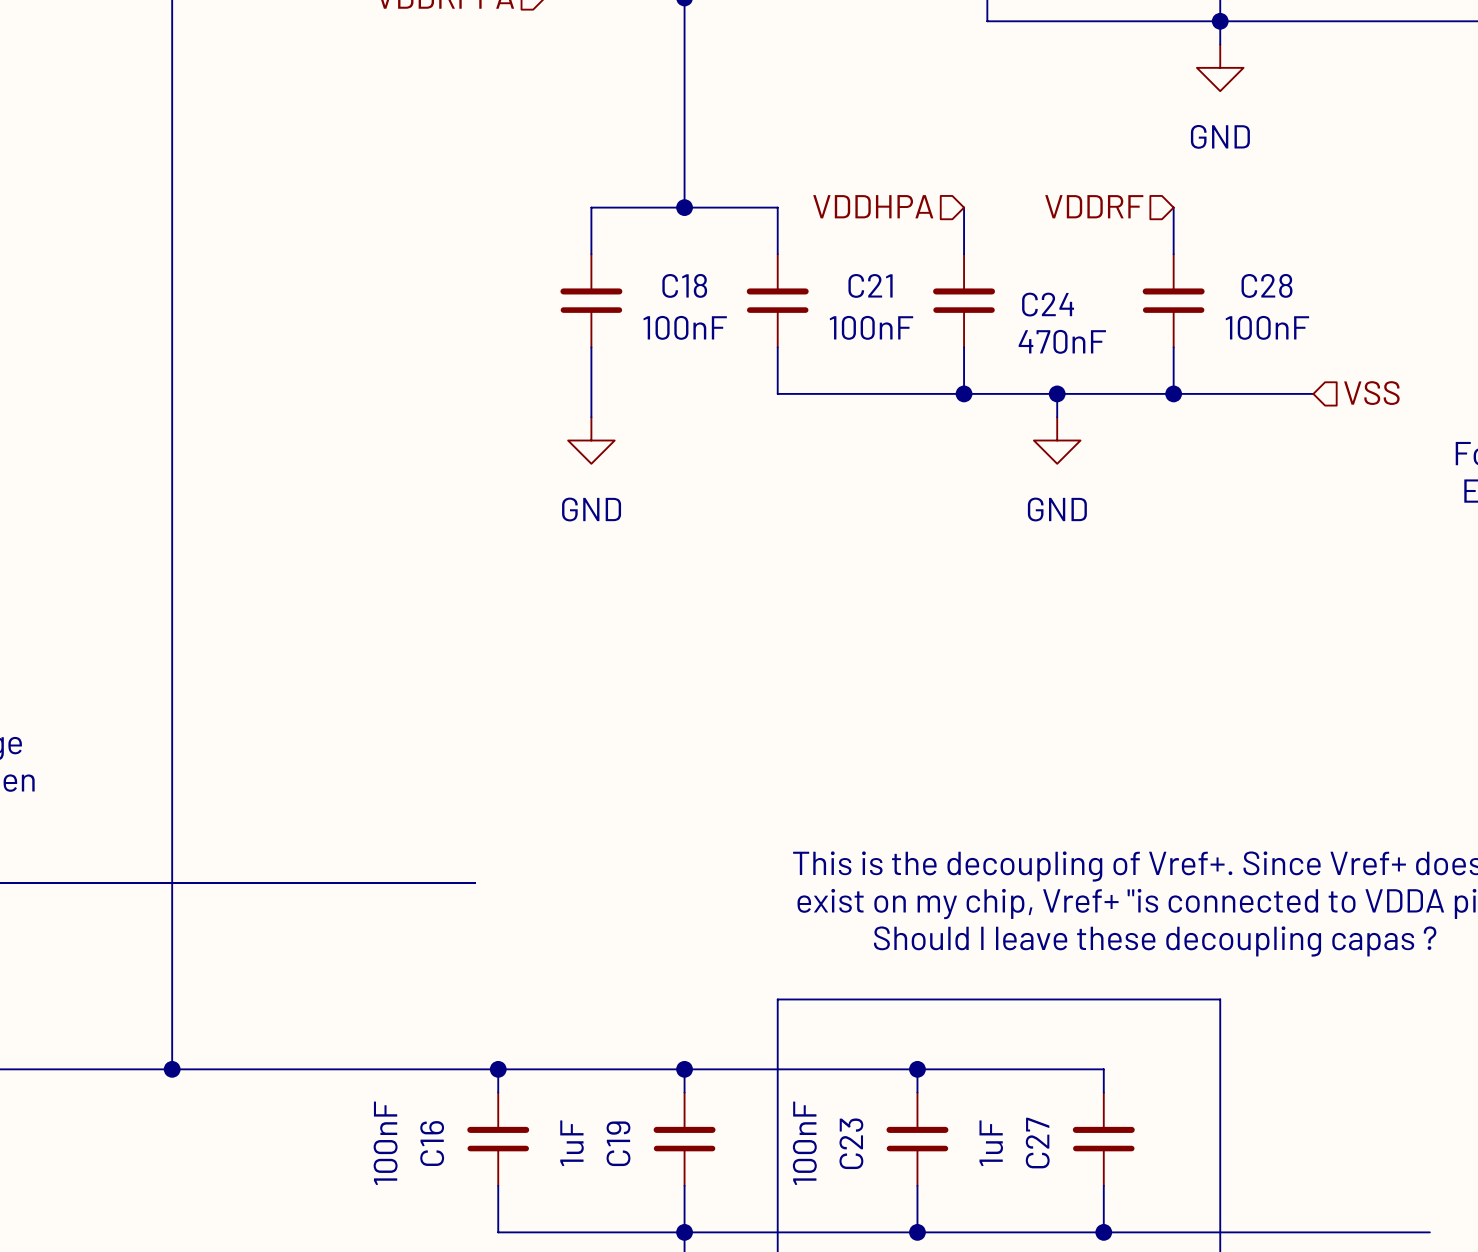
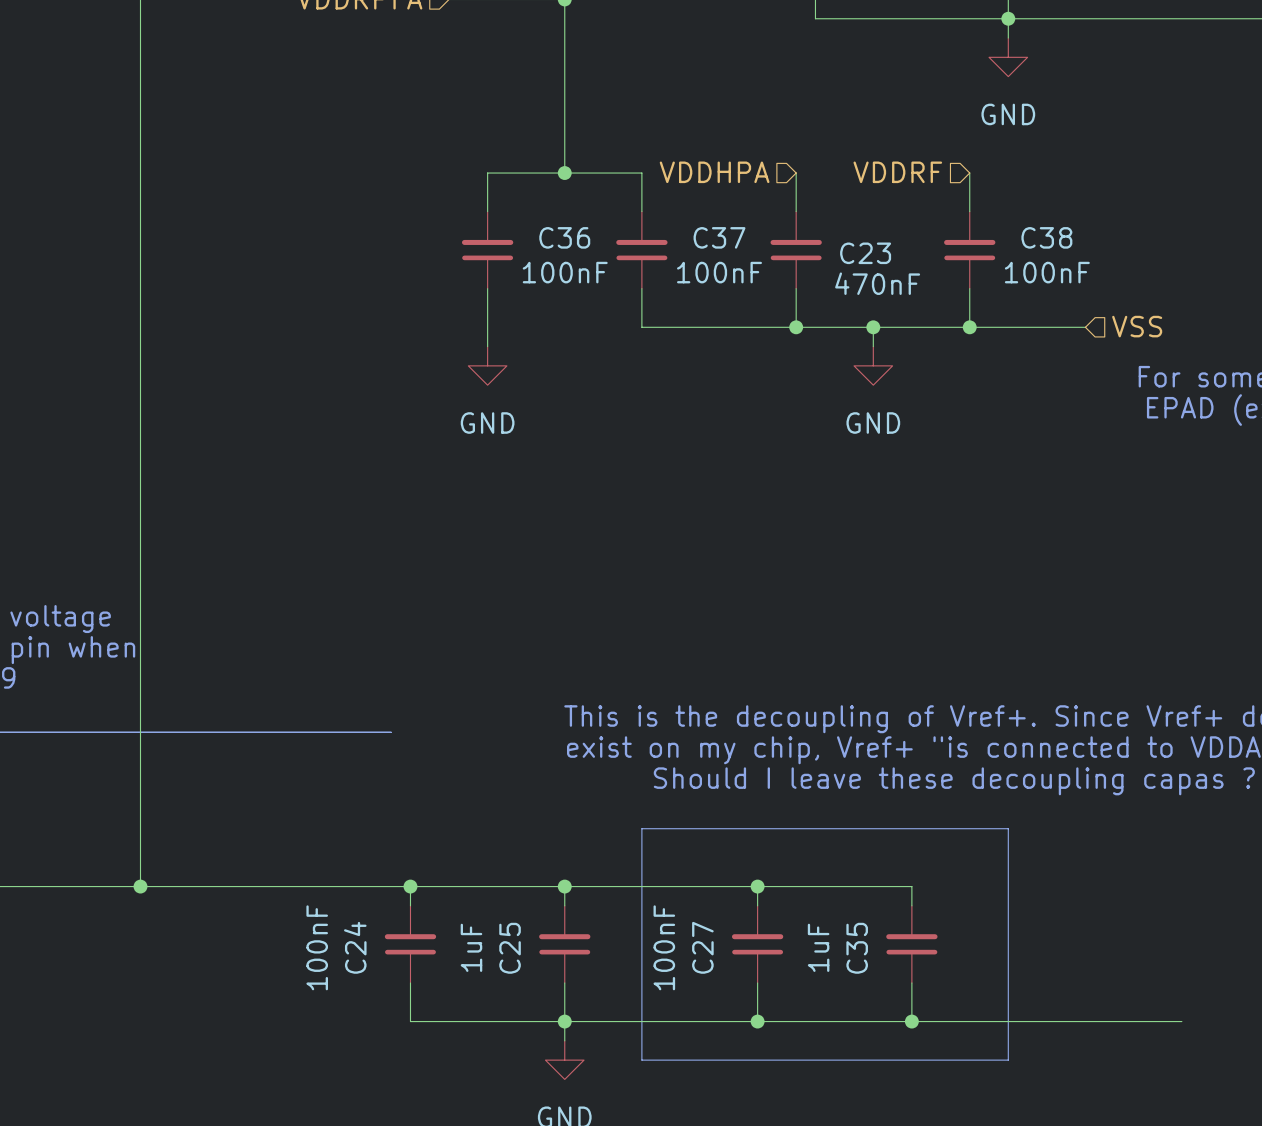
C18 name: C18 (684, 285) -> C36 (564, 237)
C21 name: C21 (870, 285) -> C37 (719, 237)
C28 name: C28 (1267, 285) -> C38 (1046, 237)
C24 name: C24 (1048, 304) -> C23 (865, 253)
C16 name: C16 (432, 1143) -> C24 (355, 947)
C19 name: C19 (618, 1143) -> C25 (510, 948)
C23 name: C23 (851, 1143) -> C27 (702, 947)
C27 name: C27 (1037, 1143) -> C35 (857, 948)

